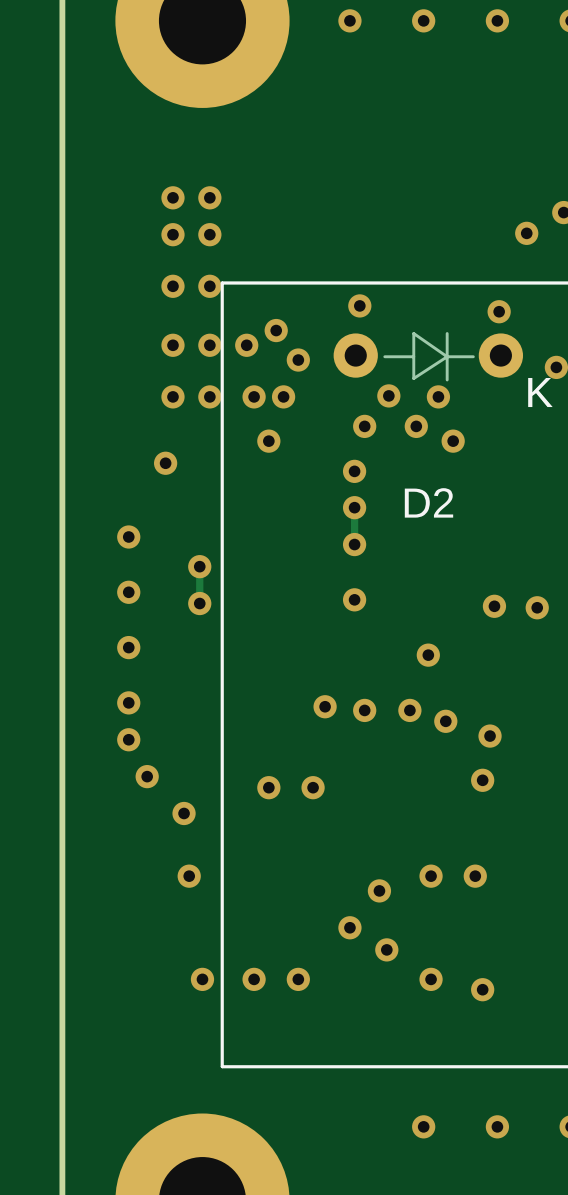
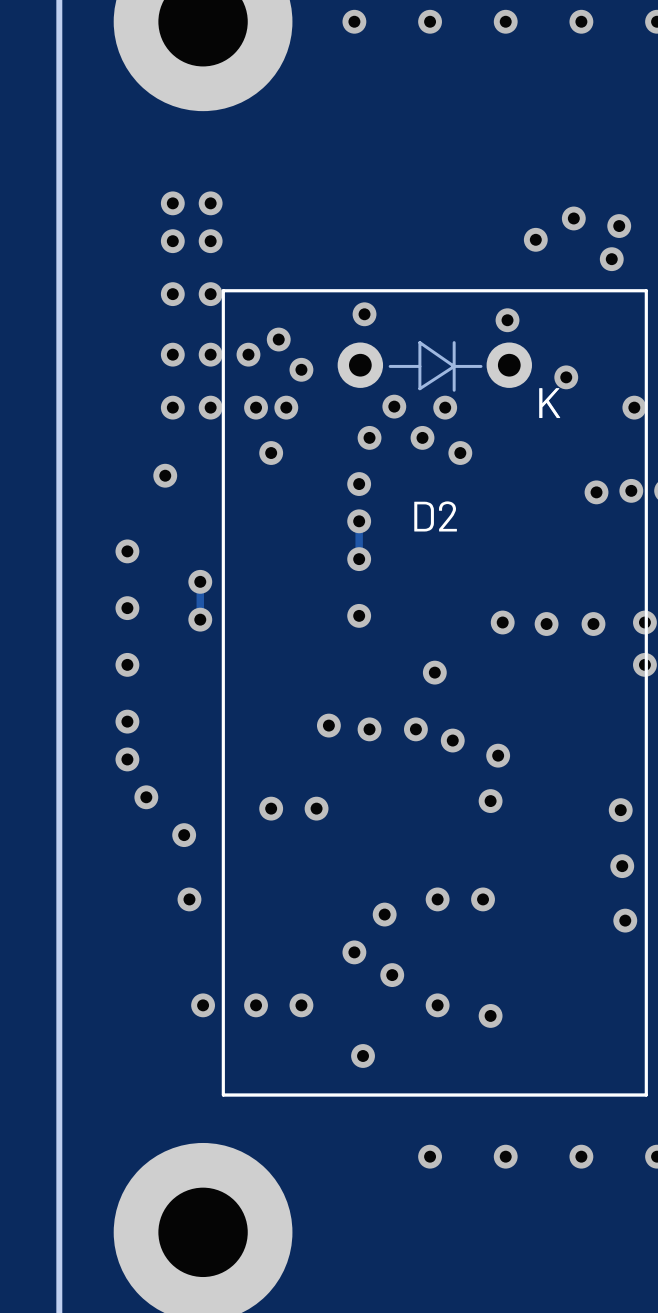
via: none -> (363, 1055)

